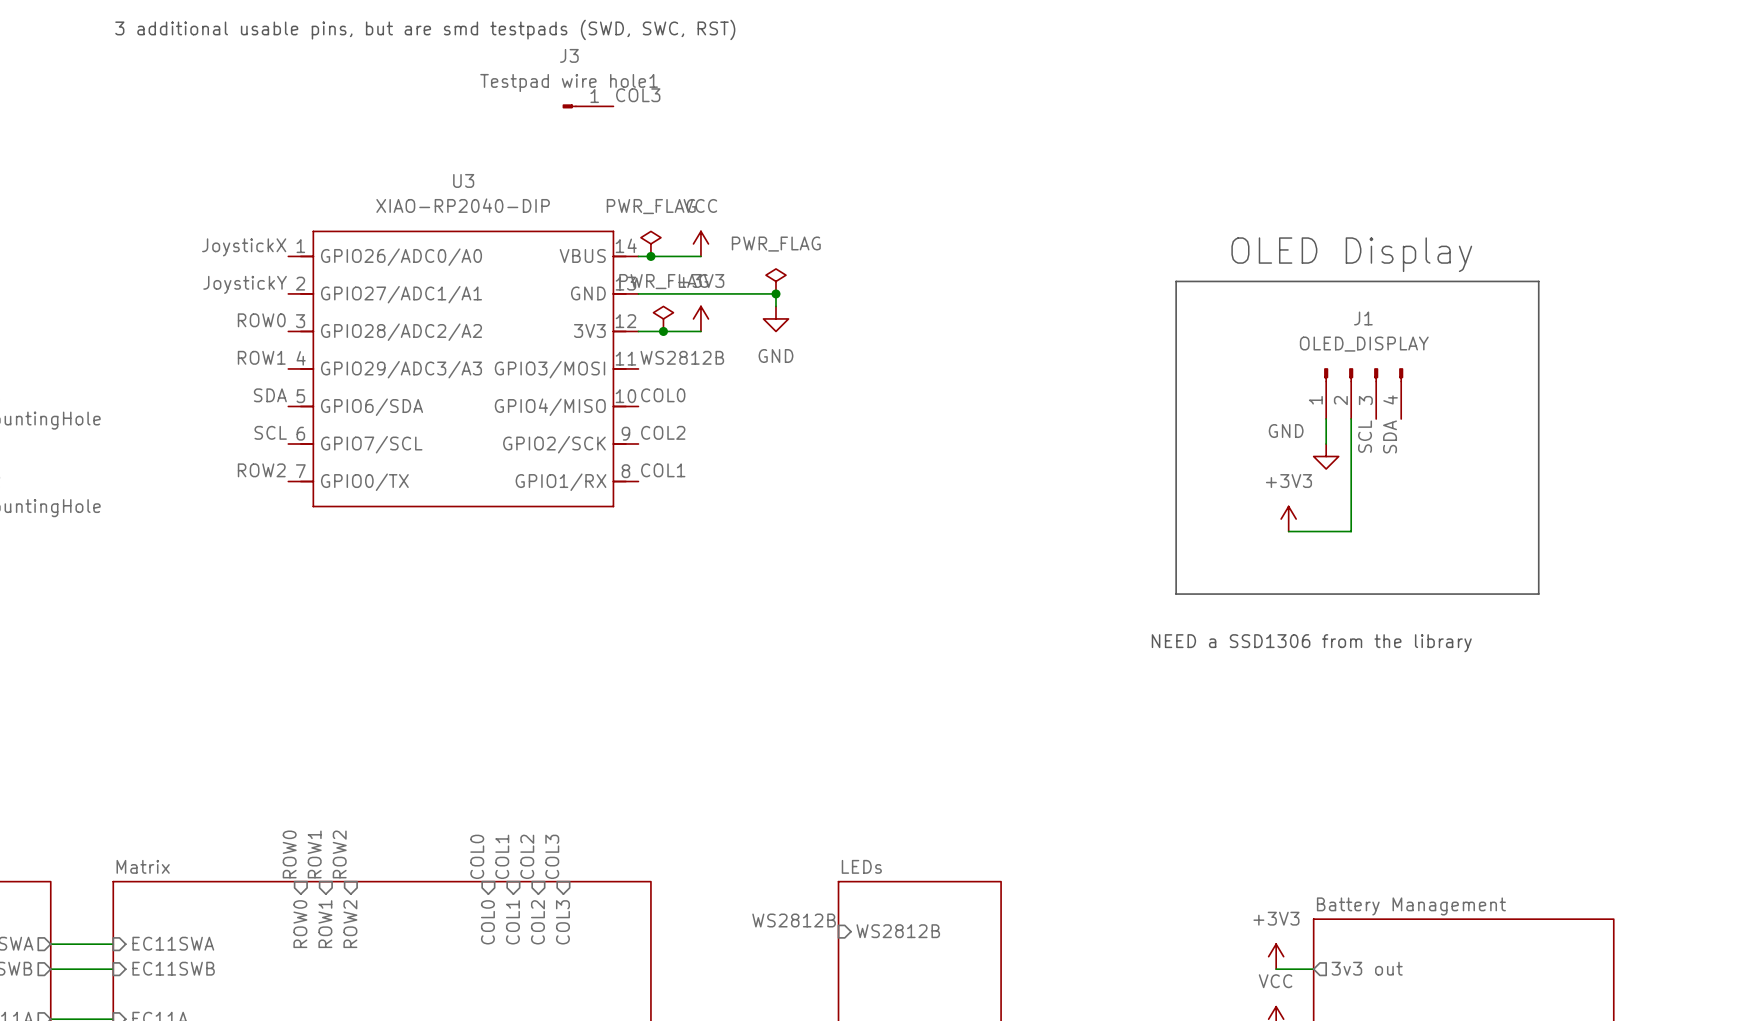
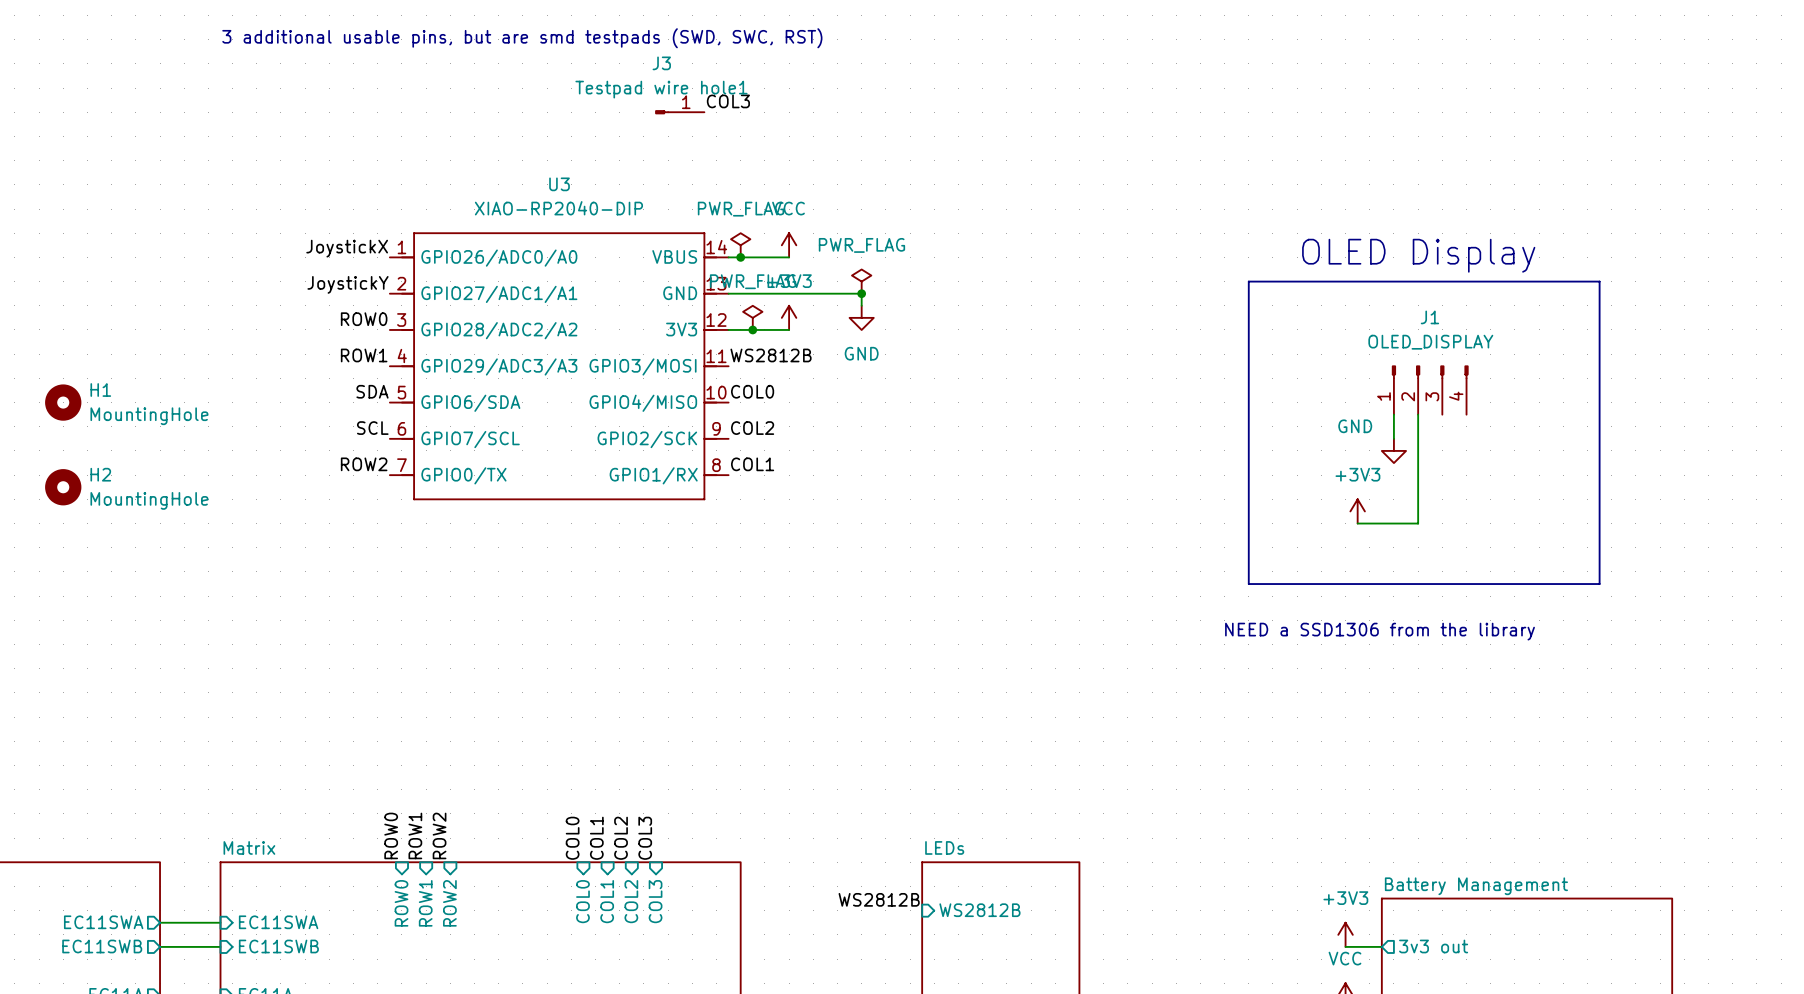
label: SCL (1365, 436) -> none
label: SDA (1390, 436) -> none

